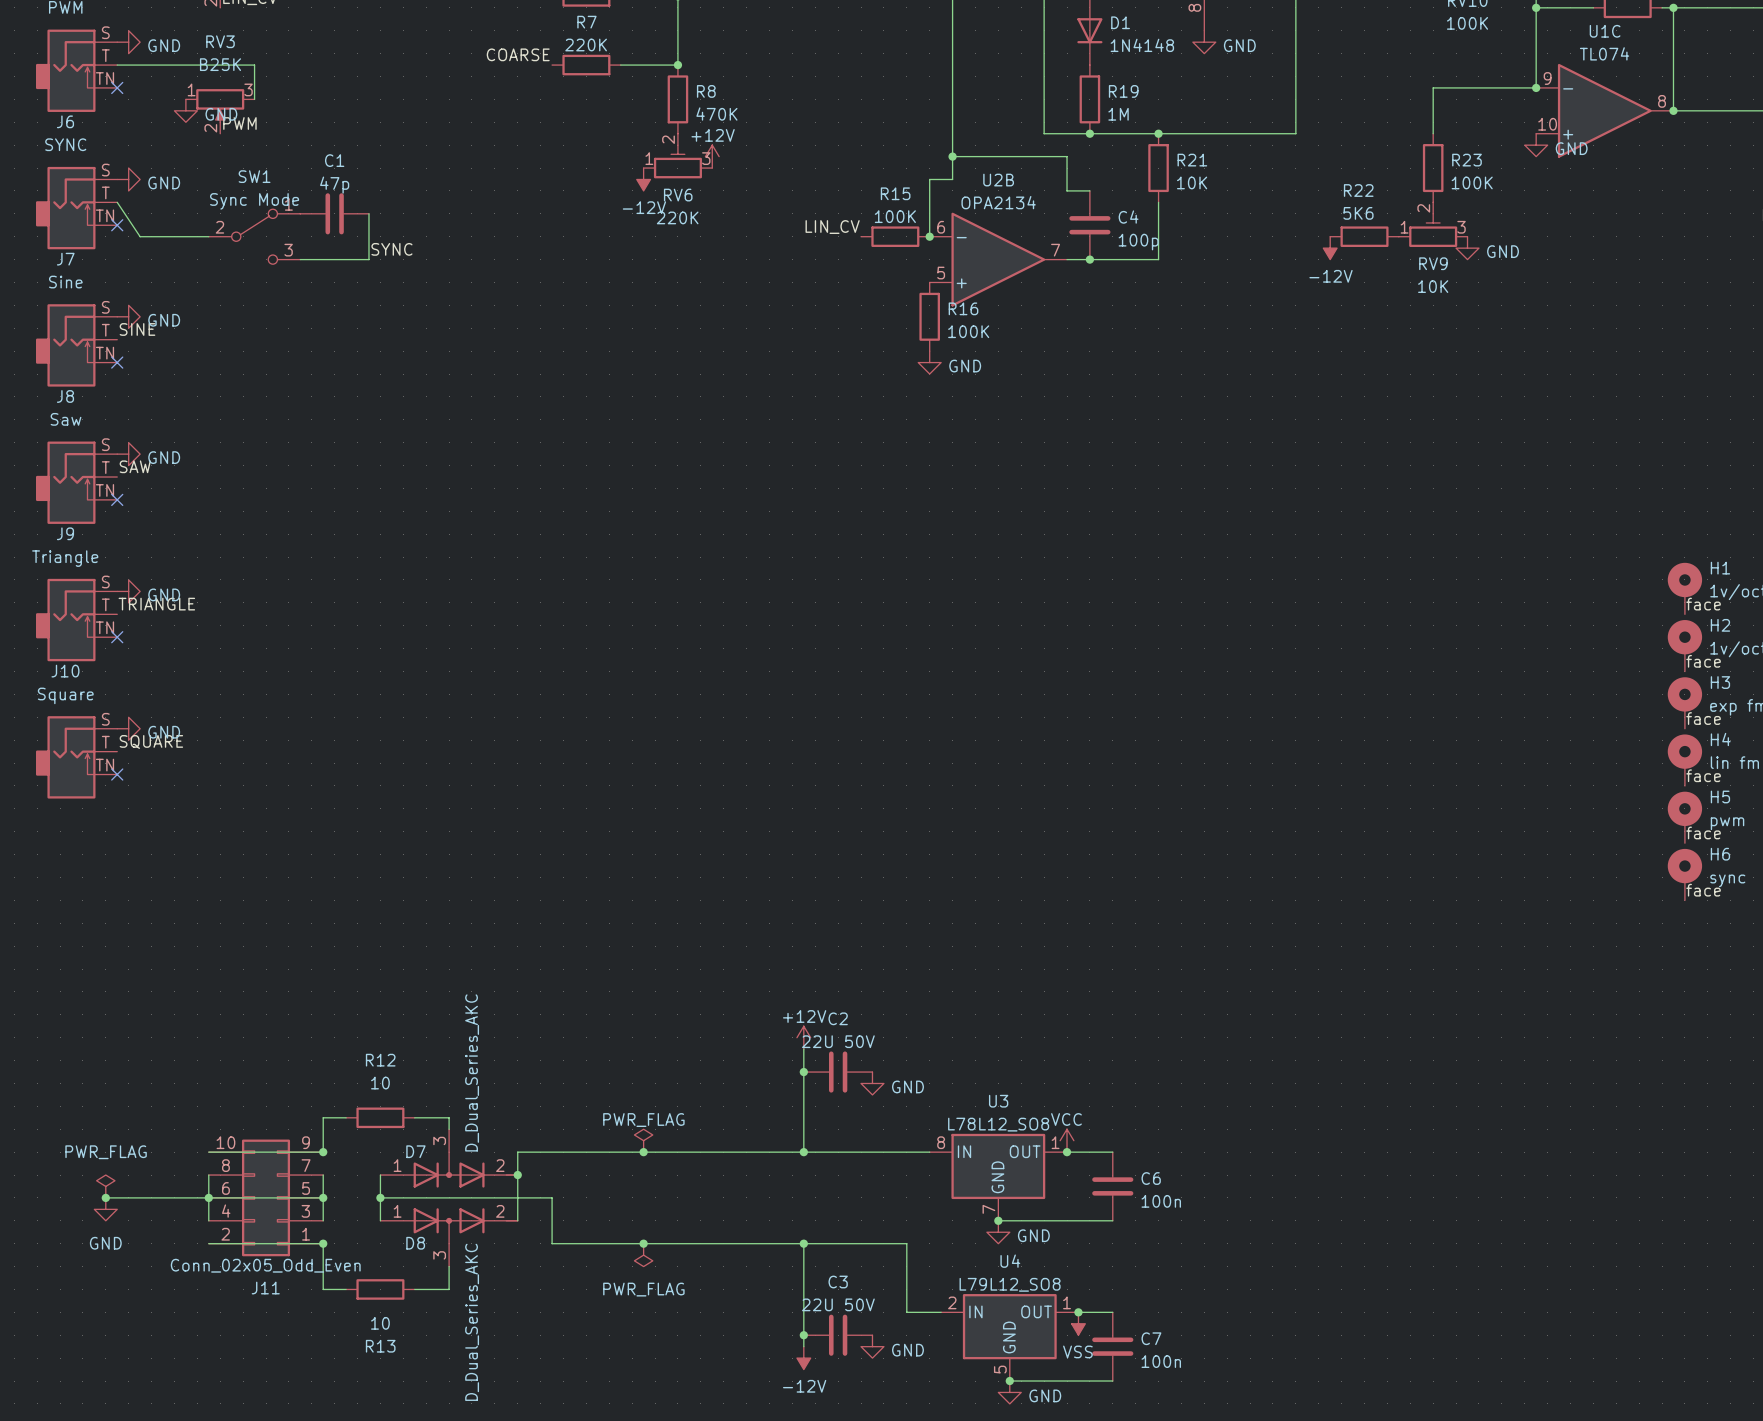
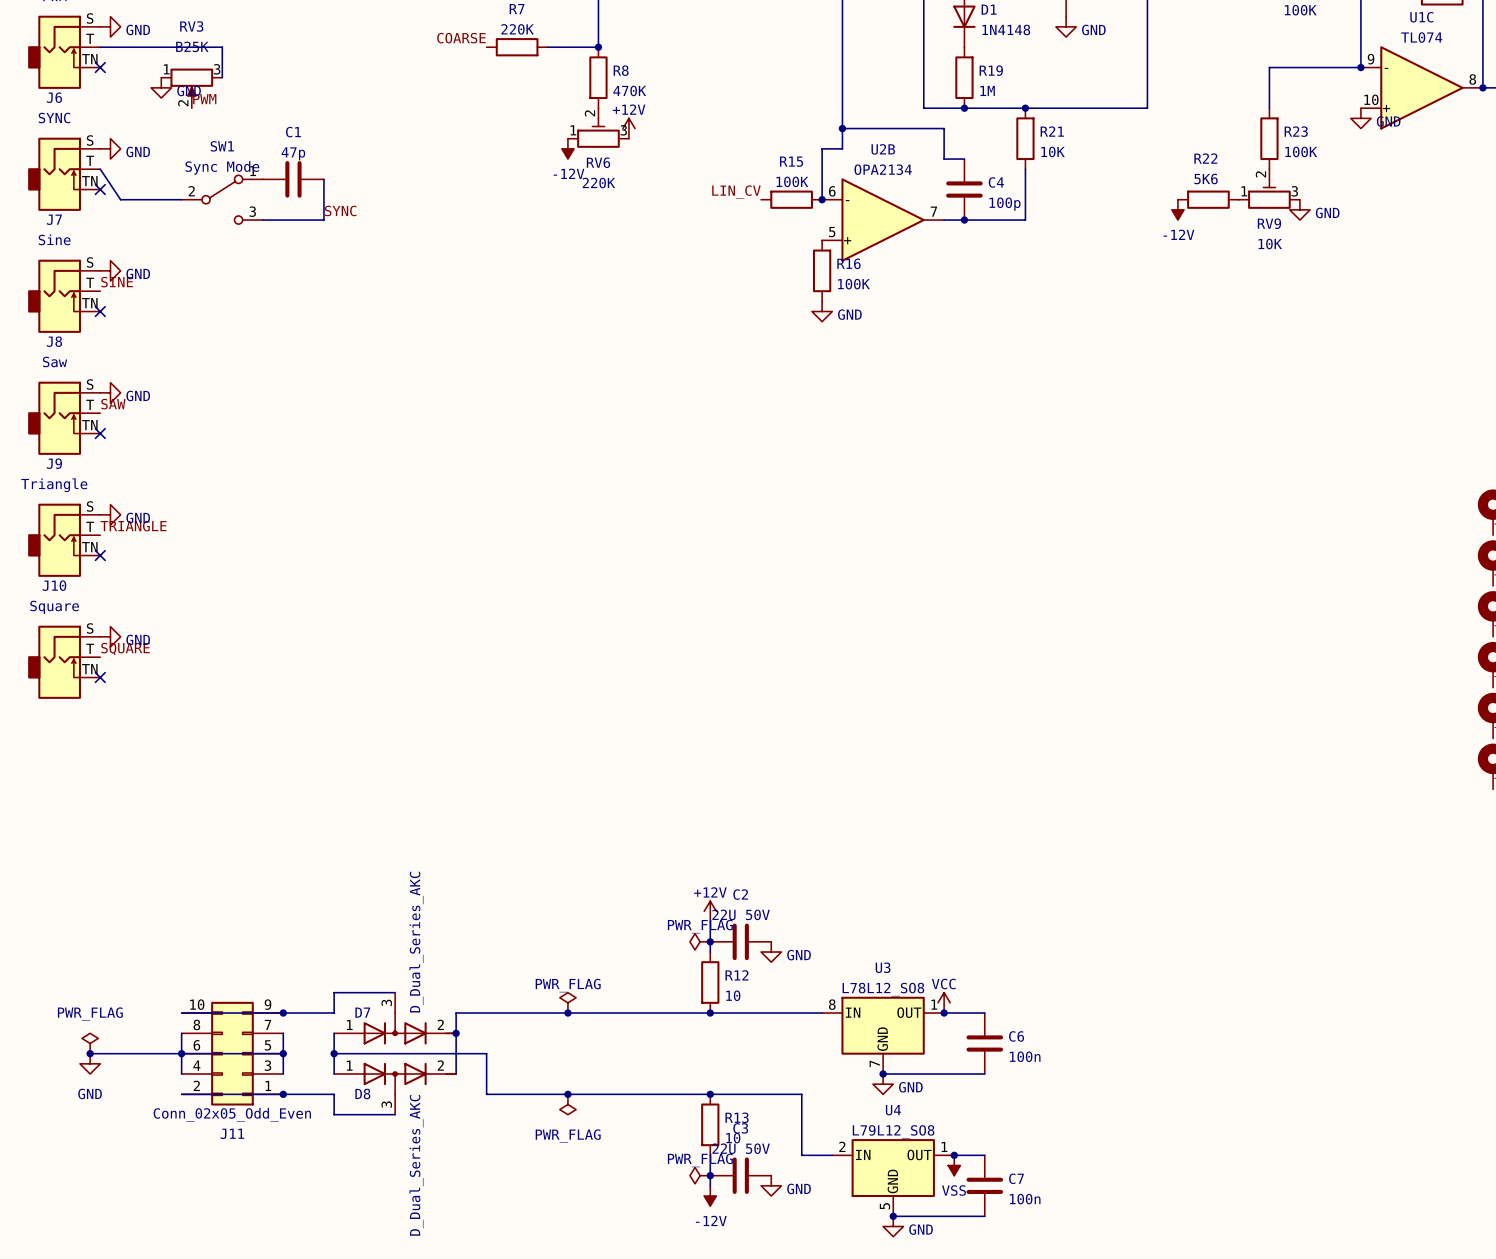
R12 name position: R12 (380, 1060) -> R12 (737, 975)
power symbol: none -> PWR_FLAG (700, 941)
wire: (803, 1083) (803, 1152) -> none
wire: (346, 1117) (323, 1117) (323, 1152) -> none
R12 rotation: 0° (380, 1117) -> 90° clockwise (710, 982)
R12 position: (380, 1117) -> (710, 982)
wire: (414, 1117) (449, 1117) (449, 1129) -> (283, 1013) (334, 1013) (334, 992) (395, 992)
wire: (323, 1243) (323, 1289) (346, 1289) -> none
wire: (803, 1243) (803, 1312) -> none
wire: (449, 1266) (449, 1289) (414, 1289) -> (395, 1114) (334, 1114) (334, 1094) (283, 1094)
R13 rotation: 0° (380, 1289) -> 90° clockwise (710, 1124)
R13 position: (380, 1289) -> (710, 1124)
R13 value position: 10 (380, 1323) -> 10 (733, 1138)
power symbol: none -> PWR_FLAG (700, 1175)
R13 name position: R13 (380, 1346) -> R13 (737, 1117)

